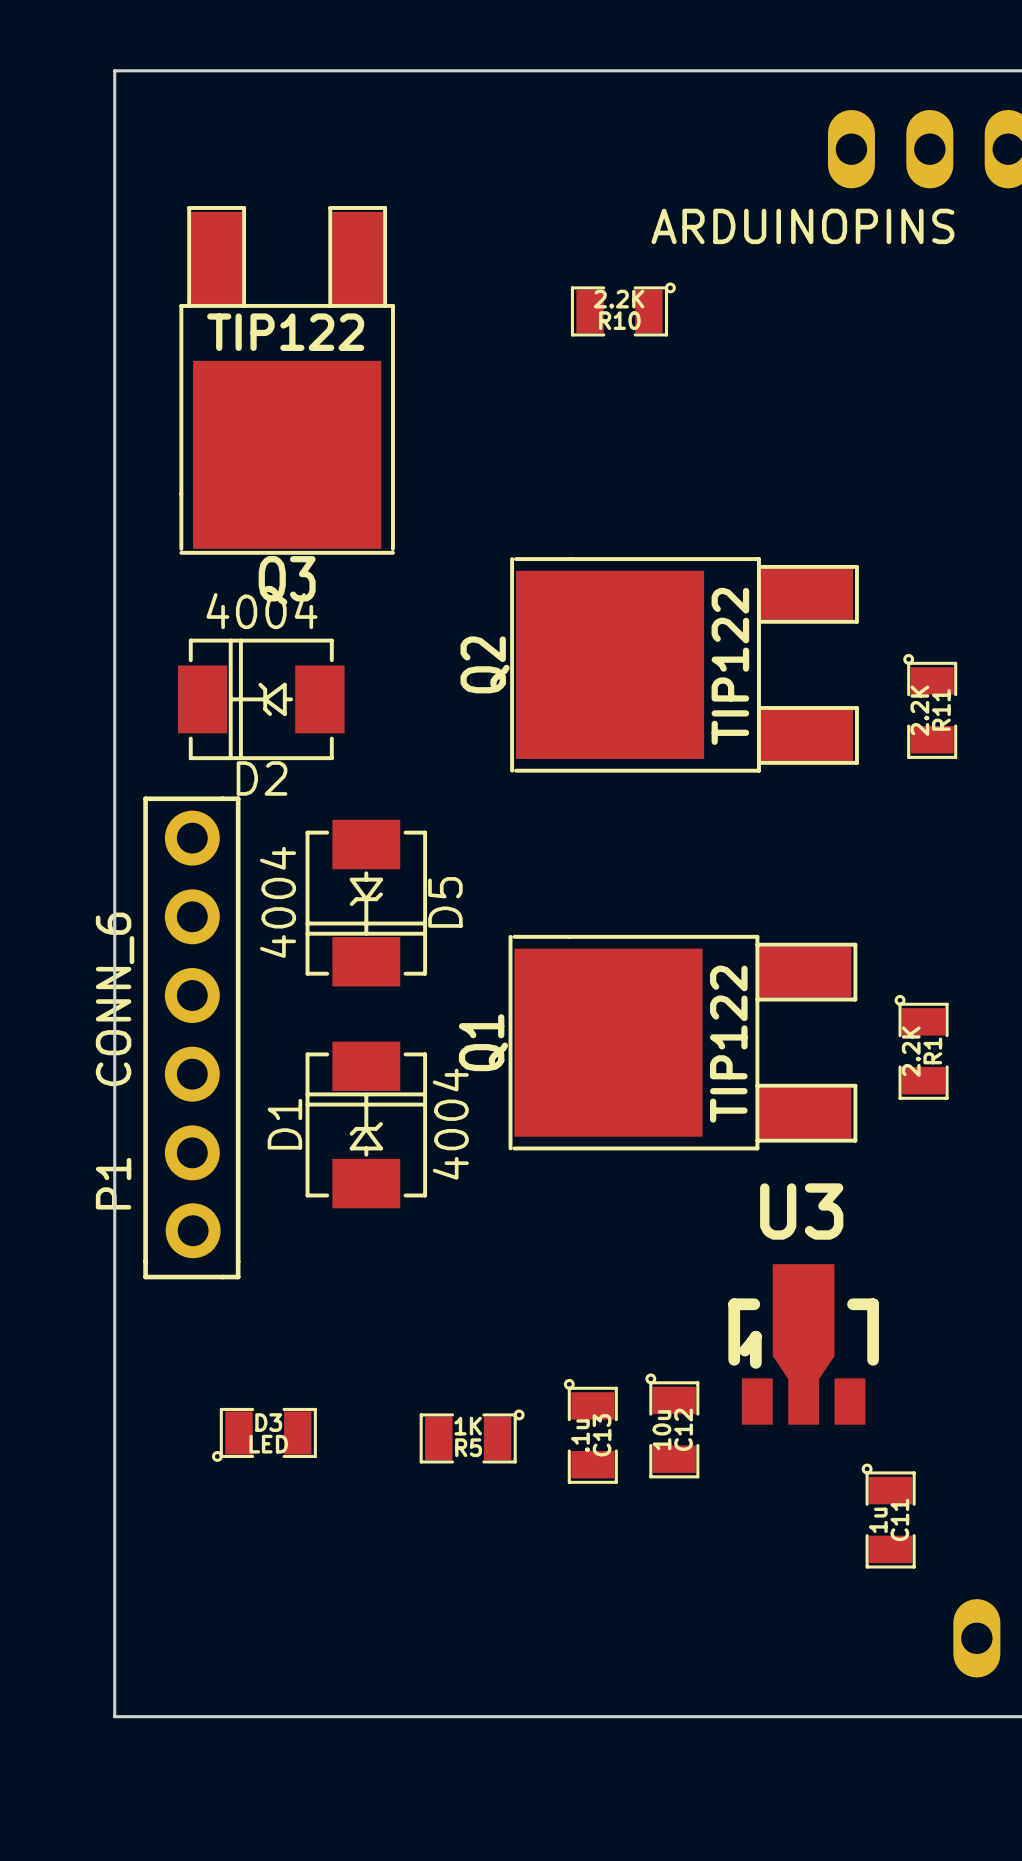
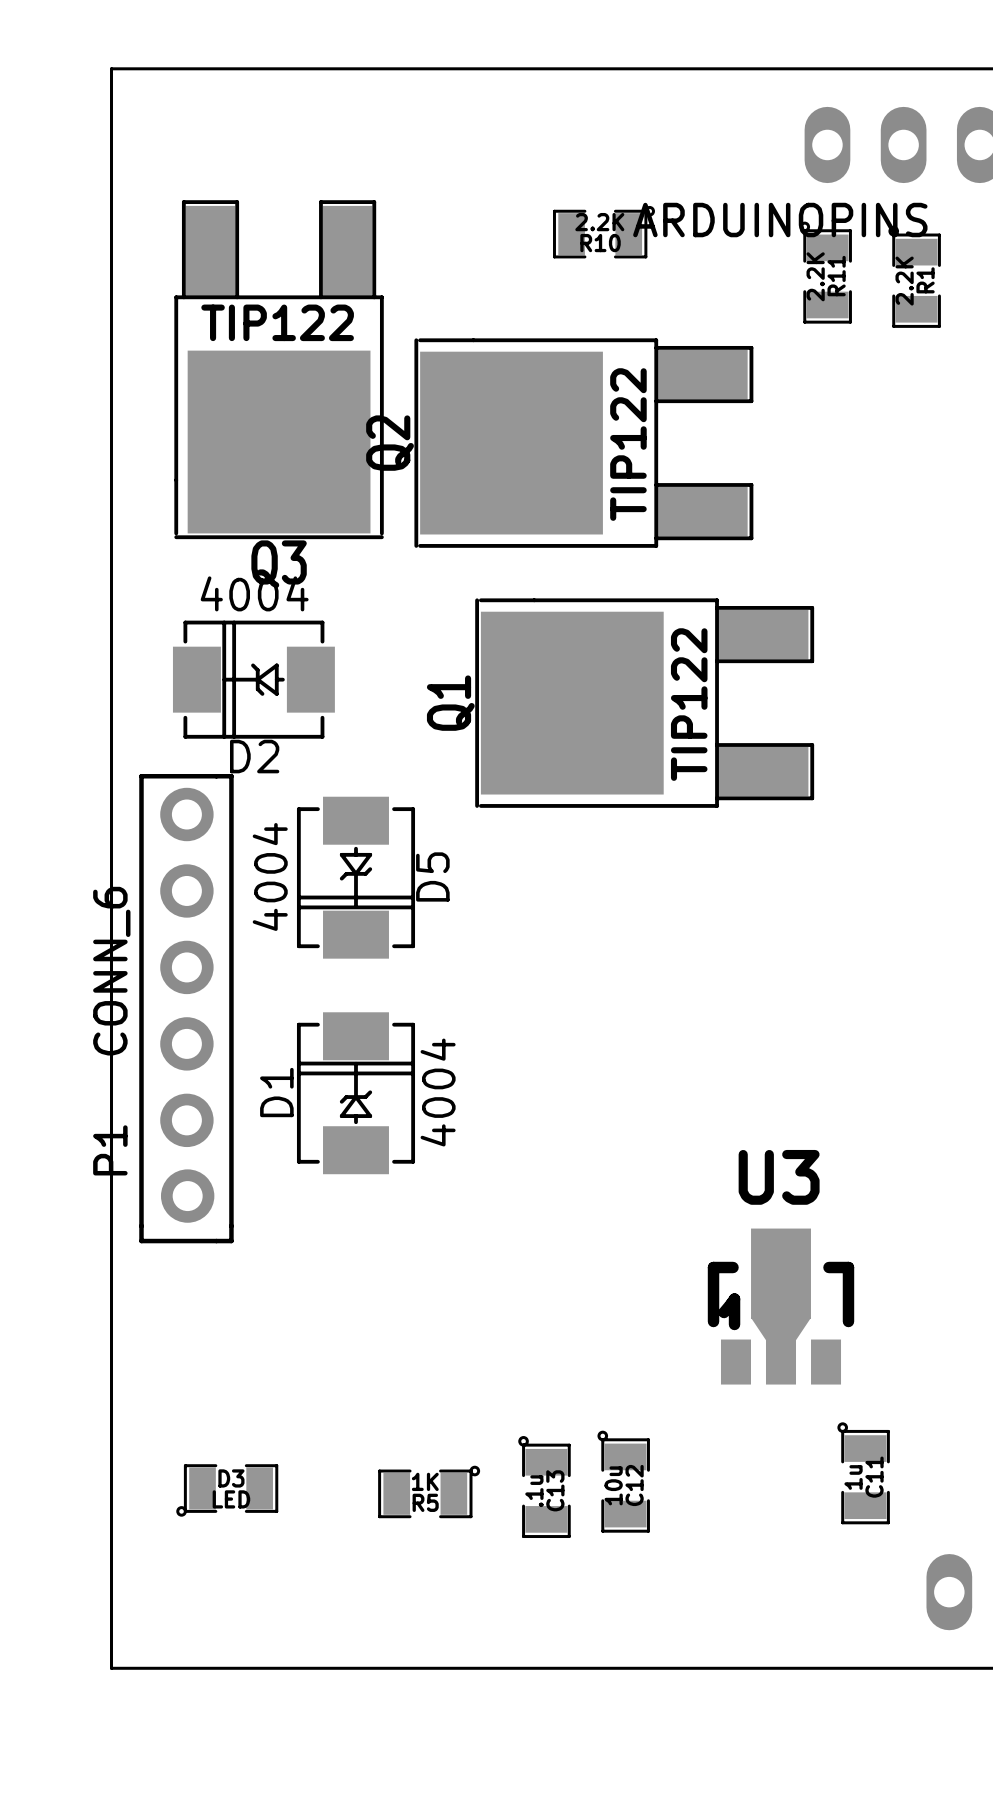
R10 position: (623, 309) -> (603, 232)
Q2 position: (684, 664) -> (583, 443)
R11 position: (930, 706) -> (825, 272)
Q1 position: (682, 1042) -> (644, 703)
R1 position: (921, 1047) -> (914, 276)
C12 position: (672, 1425) -> (623, 1481)
C13 position: (590, 1431) -> (544, 1487)
D3 position: (264, 1434) -> (227, 1490)
R5 position: (472, 1436) -> (429, 1491)

